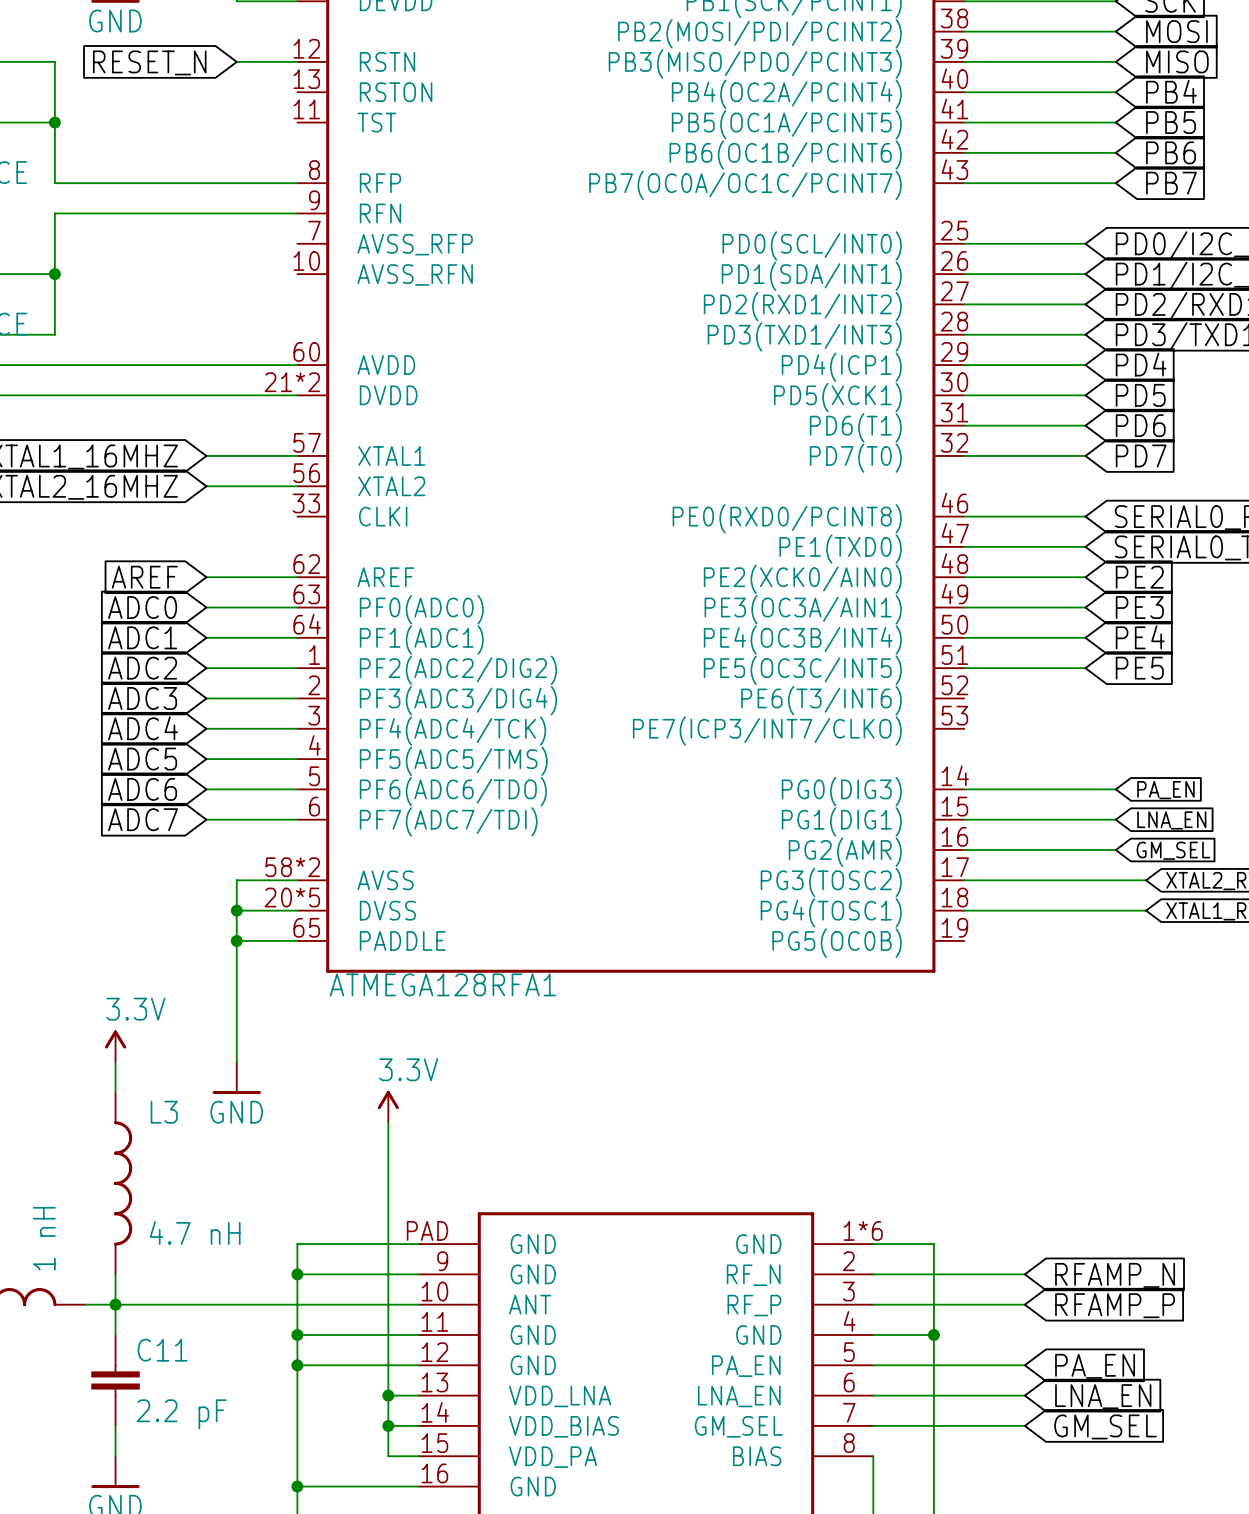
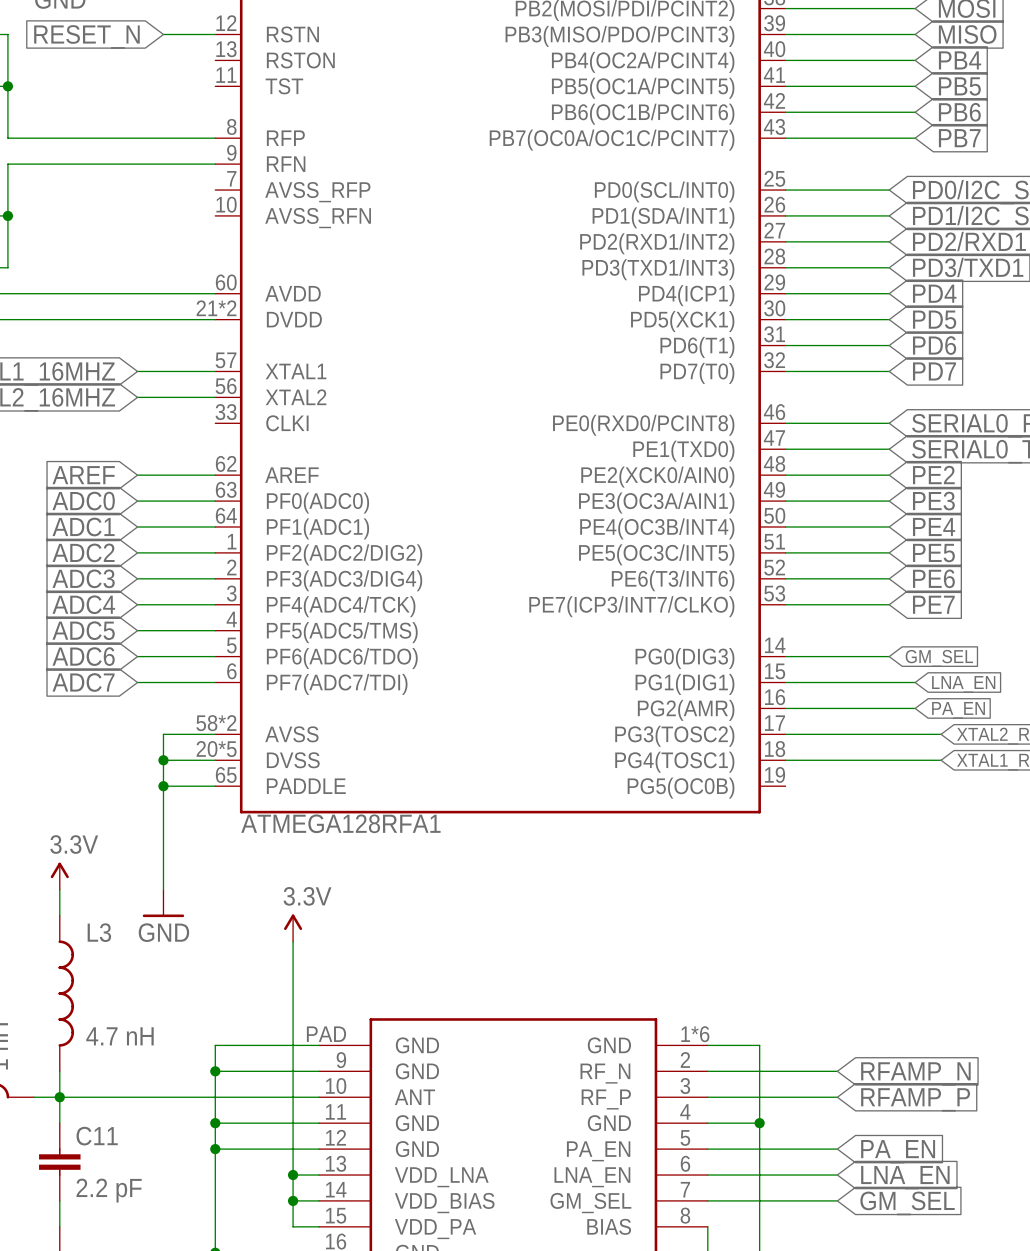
wire: none -> (785, 578) (889, 578)
global label: none -> PE6 (933, 578)
wire: none -> (785, 604) (889, 604)
global label: none -> PE7 (933, 604)
wire: (1085, 789) (1115, 789) -> none
global label: none -> GM_SEL (939, 658)
global label: PA_EN (1165, 790) -> none
global label: GM_SEL (1173, 850) -> PA_EN (958, 710)

